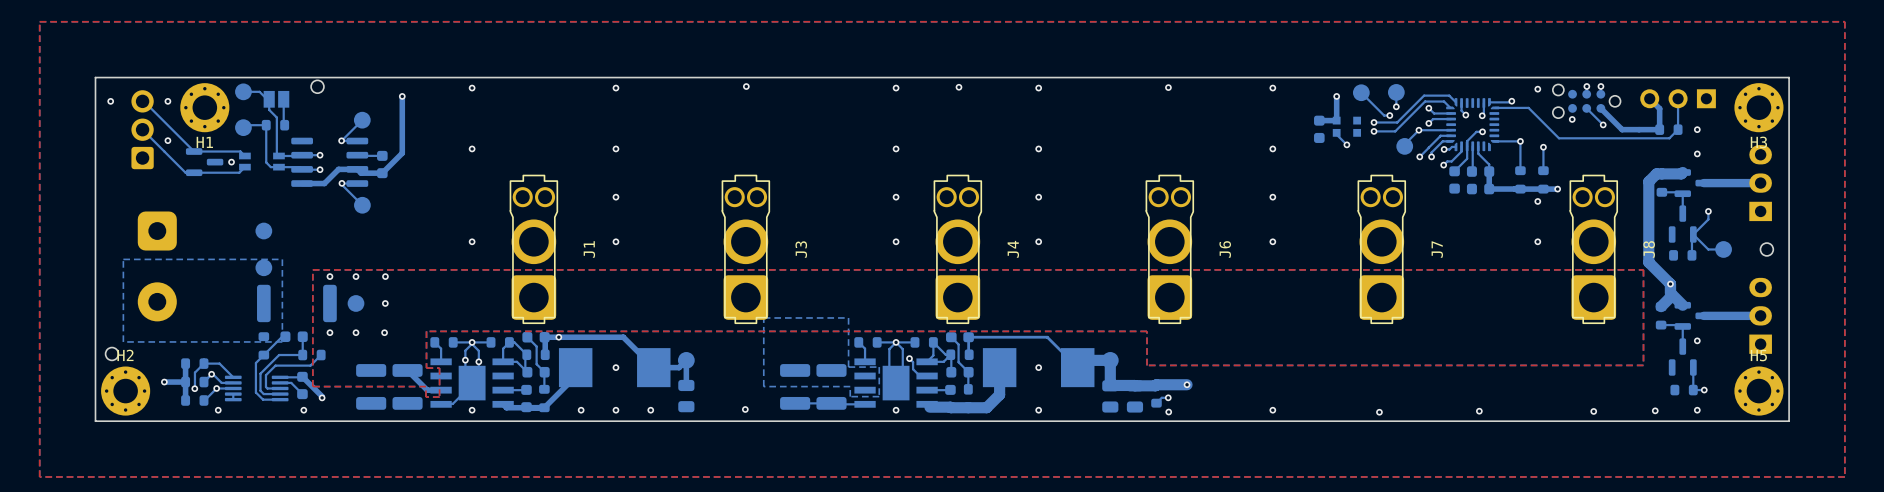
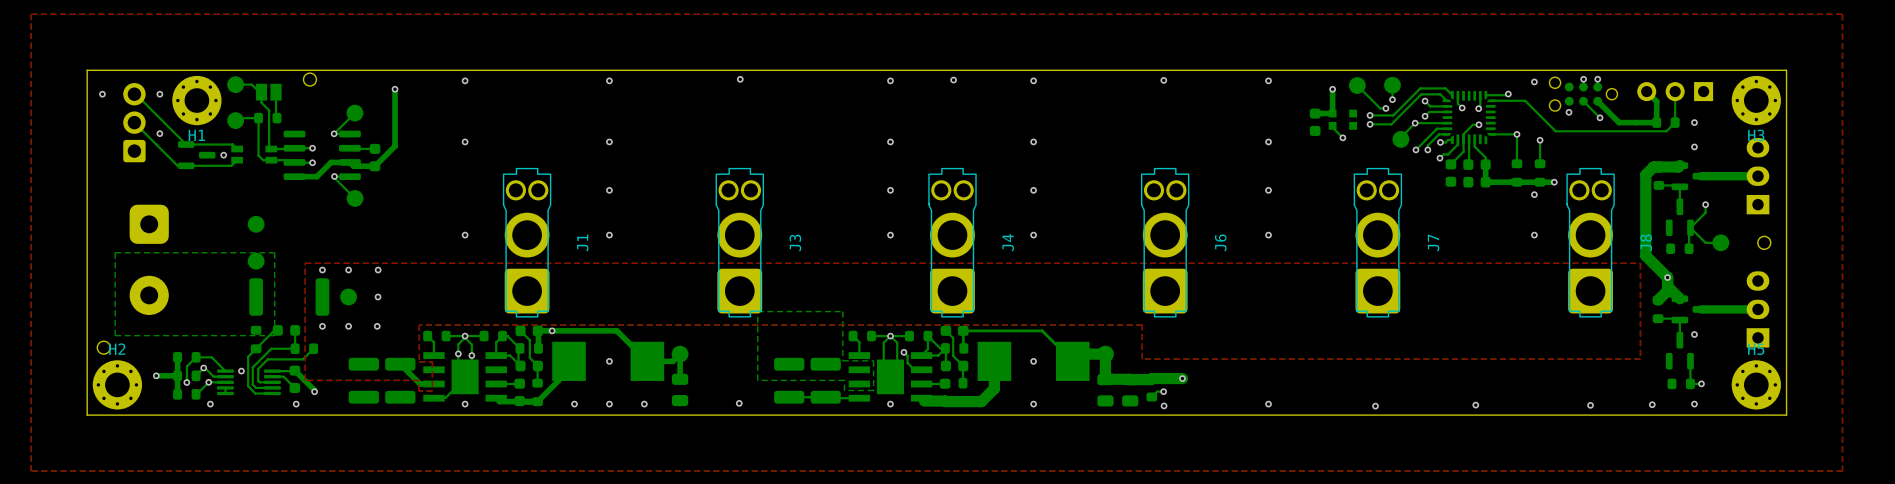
via: none -> (241, 371)

